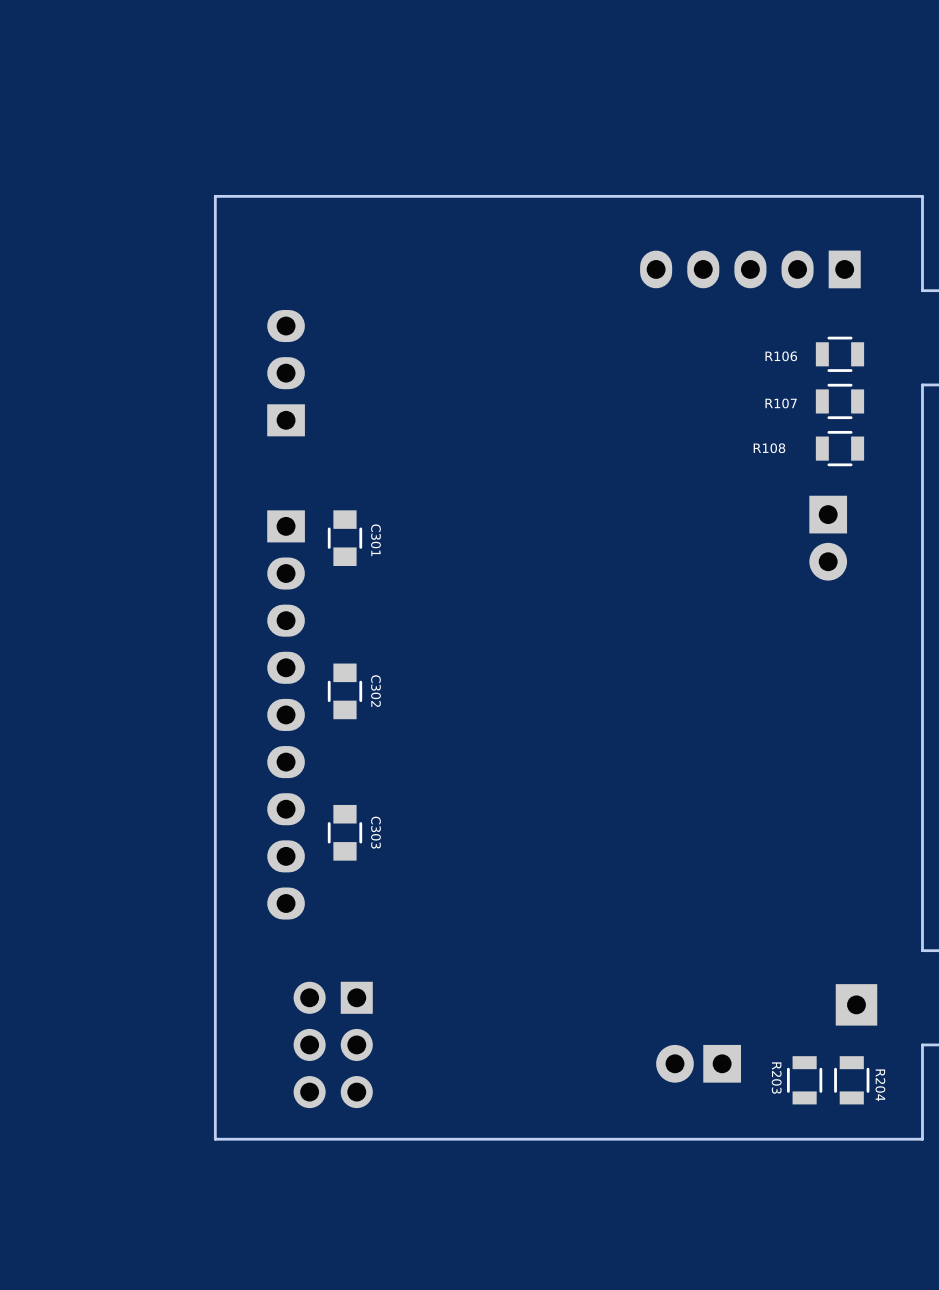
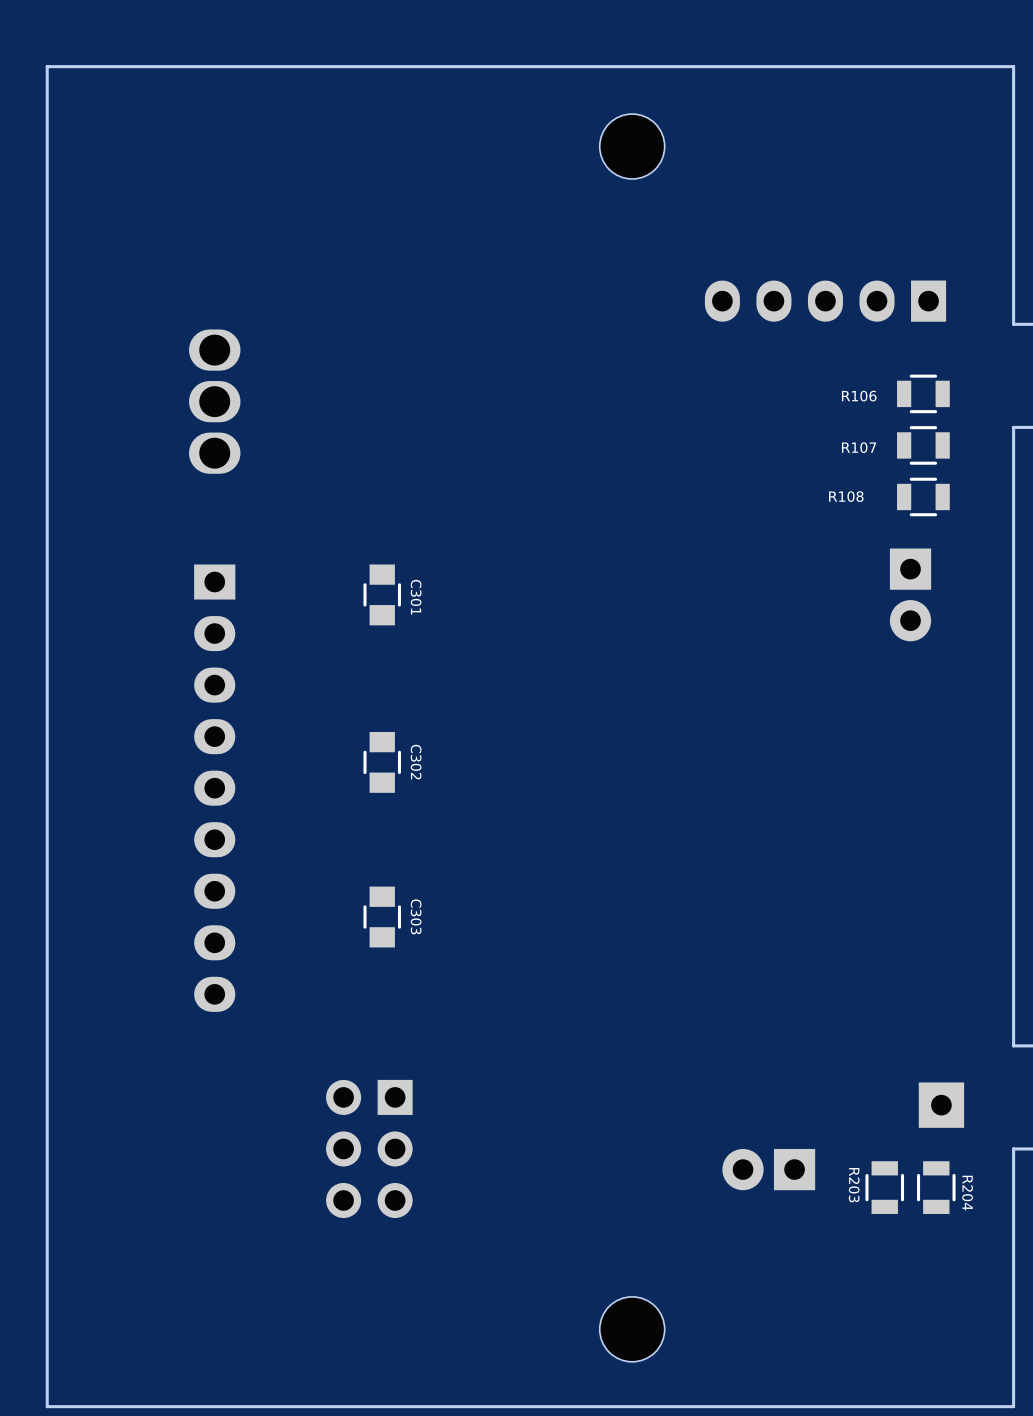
part: none -> (632, 146)
board edge: (922, 196) (215, 196) (215, 1139) (922, 1139) -> (1013, 221) (1013, 66) (47, 66) (47, 1406) (1013, 1406) (1013, 1252)
part: none -> (214, 401)
part: (286, 373) -> none
part position: (286, 714) -> (214, 788)
part: none -> (632, 1329)

